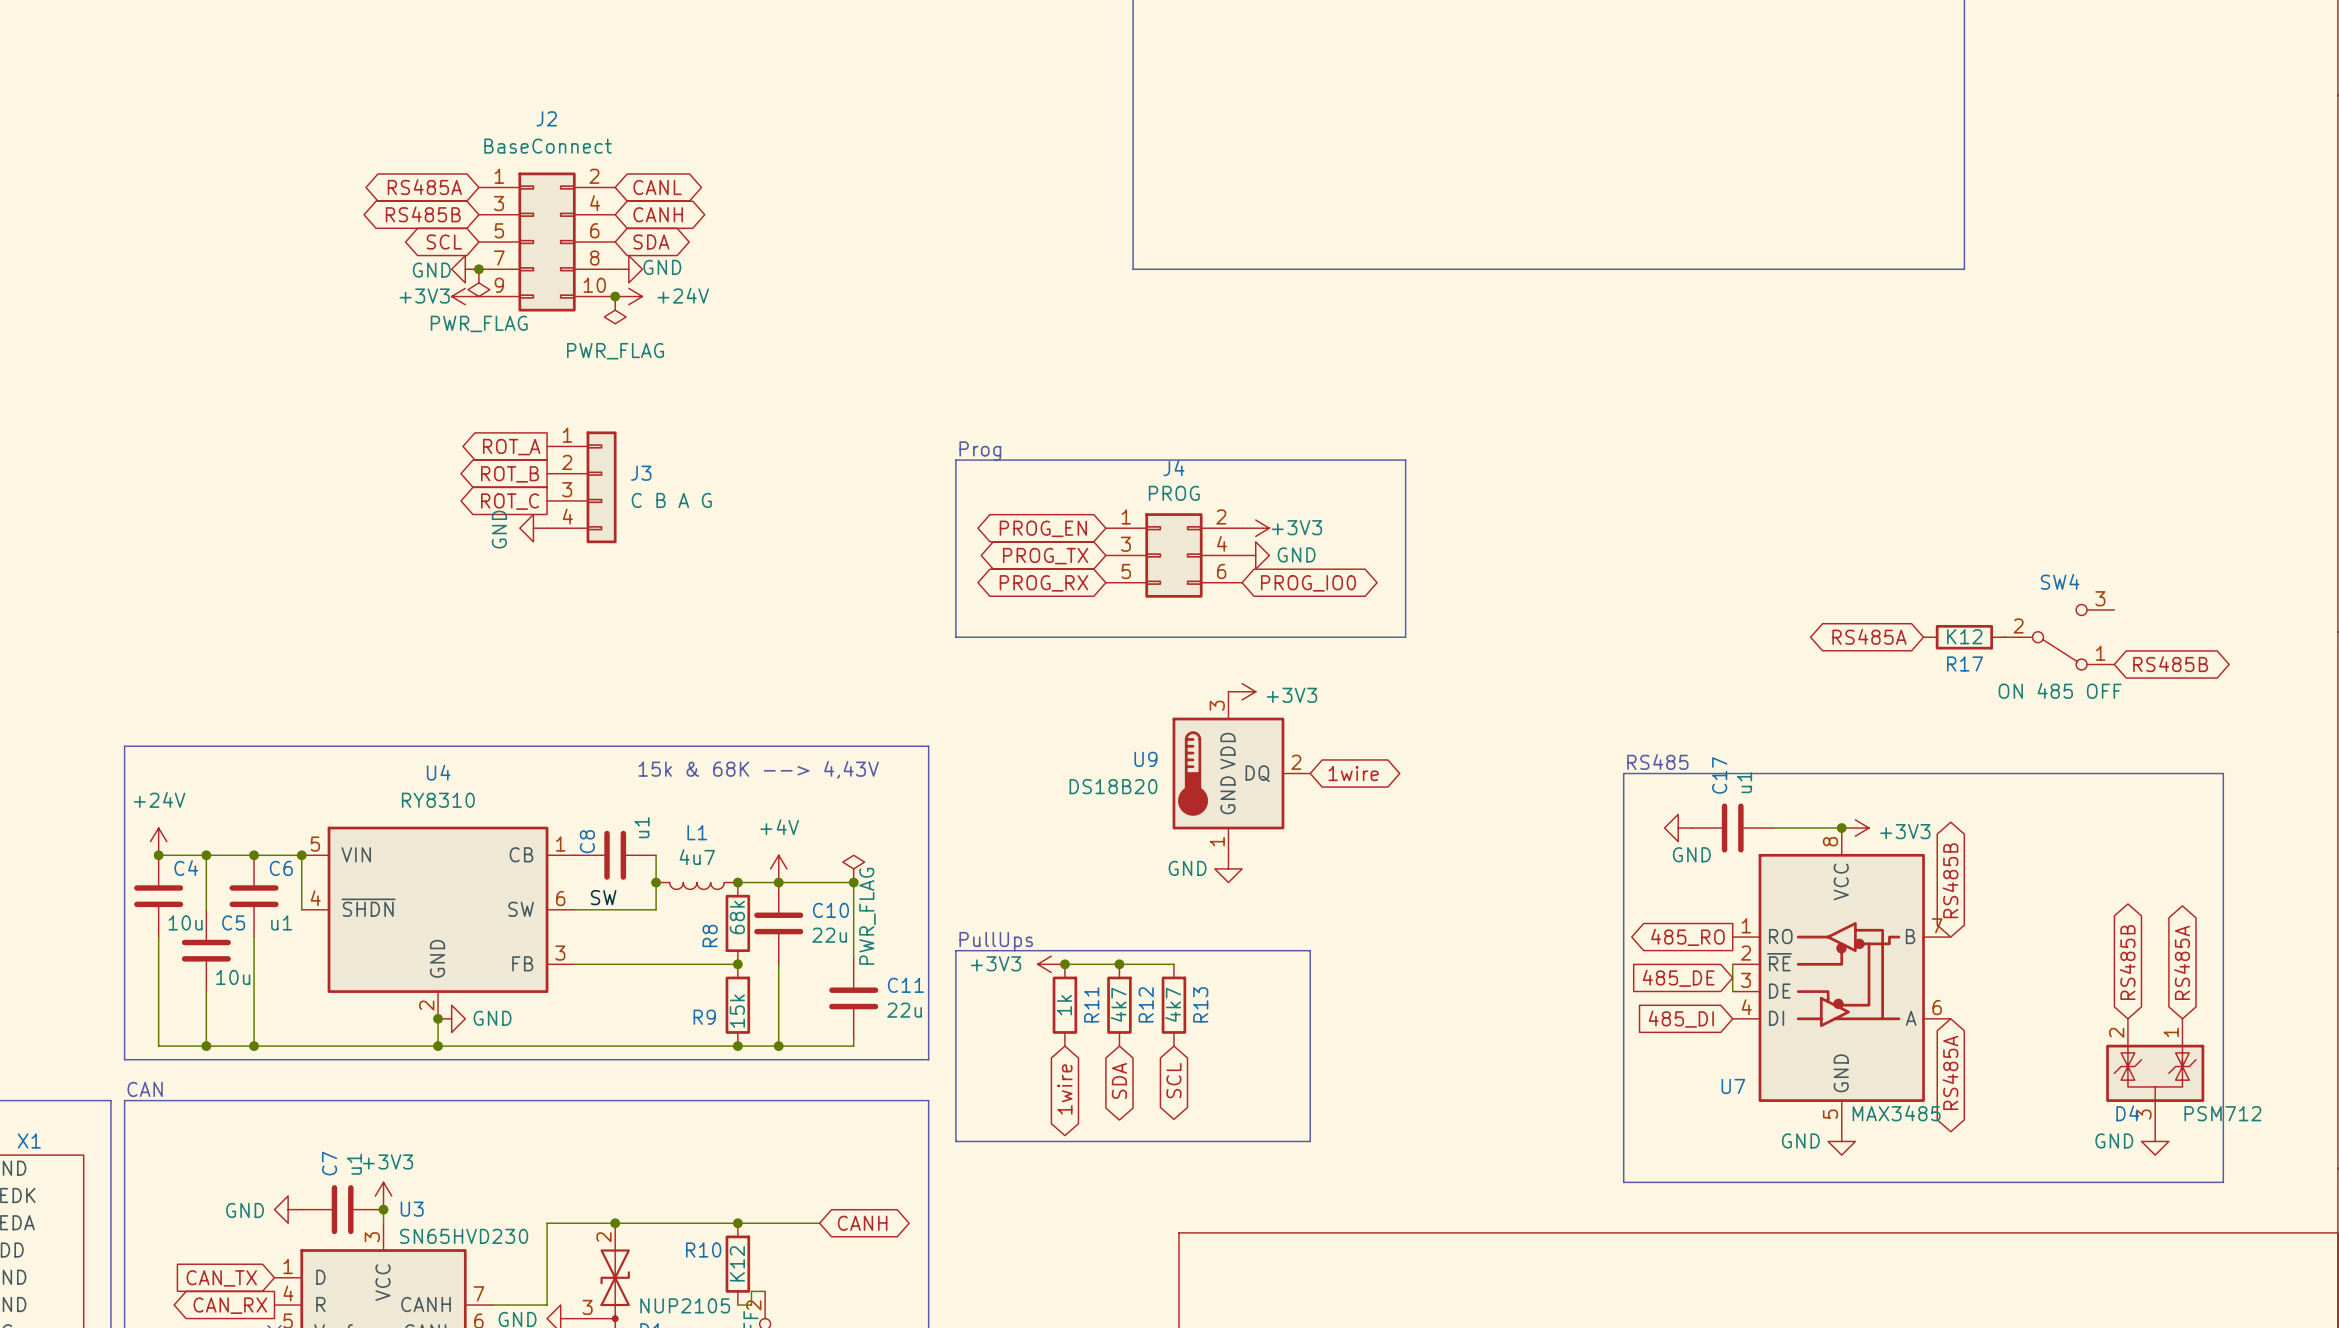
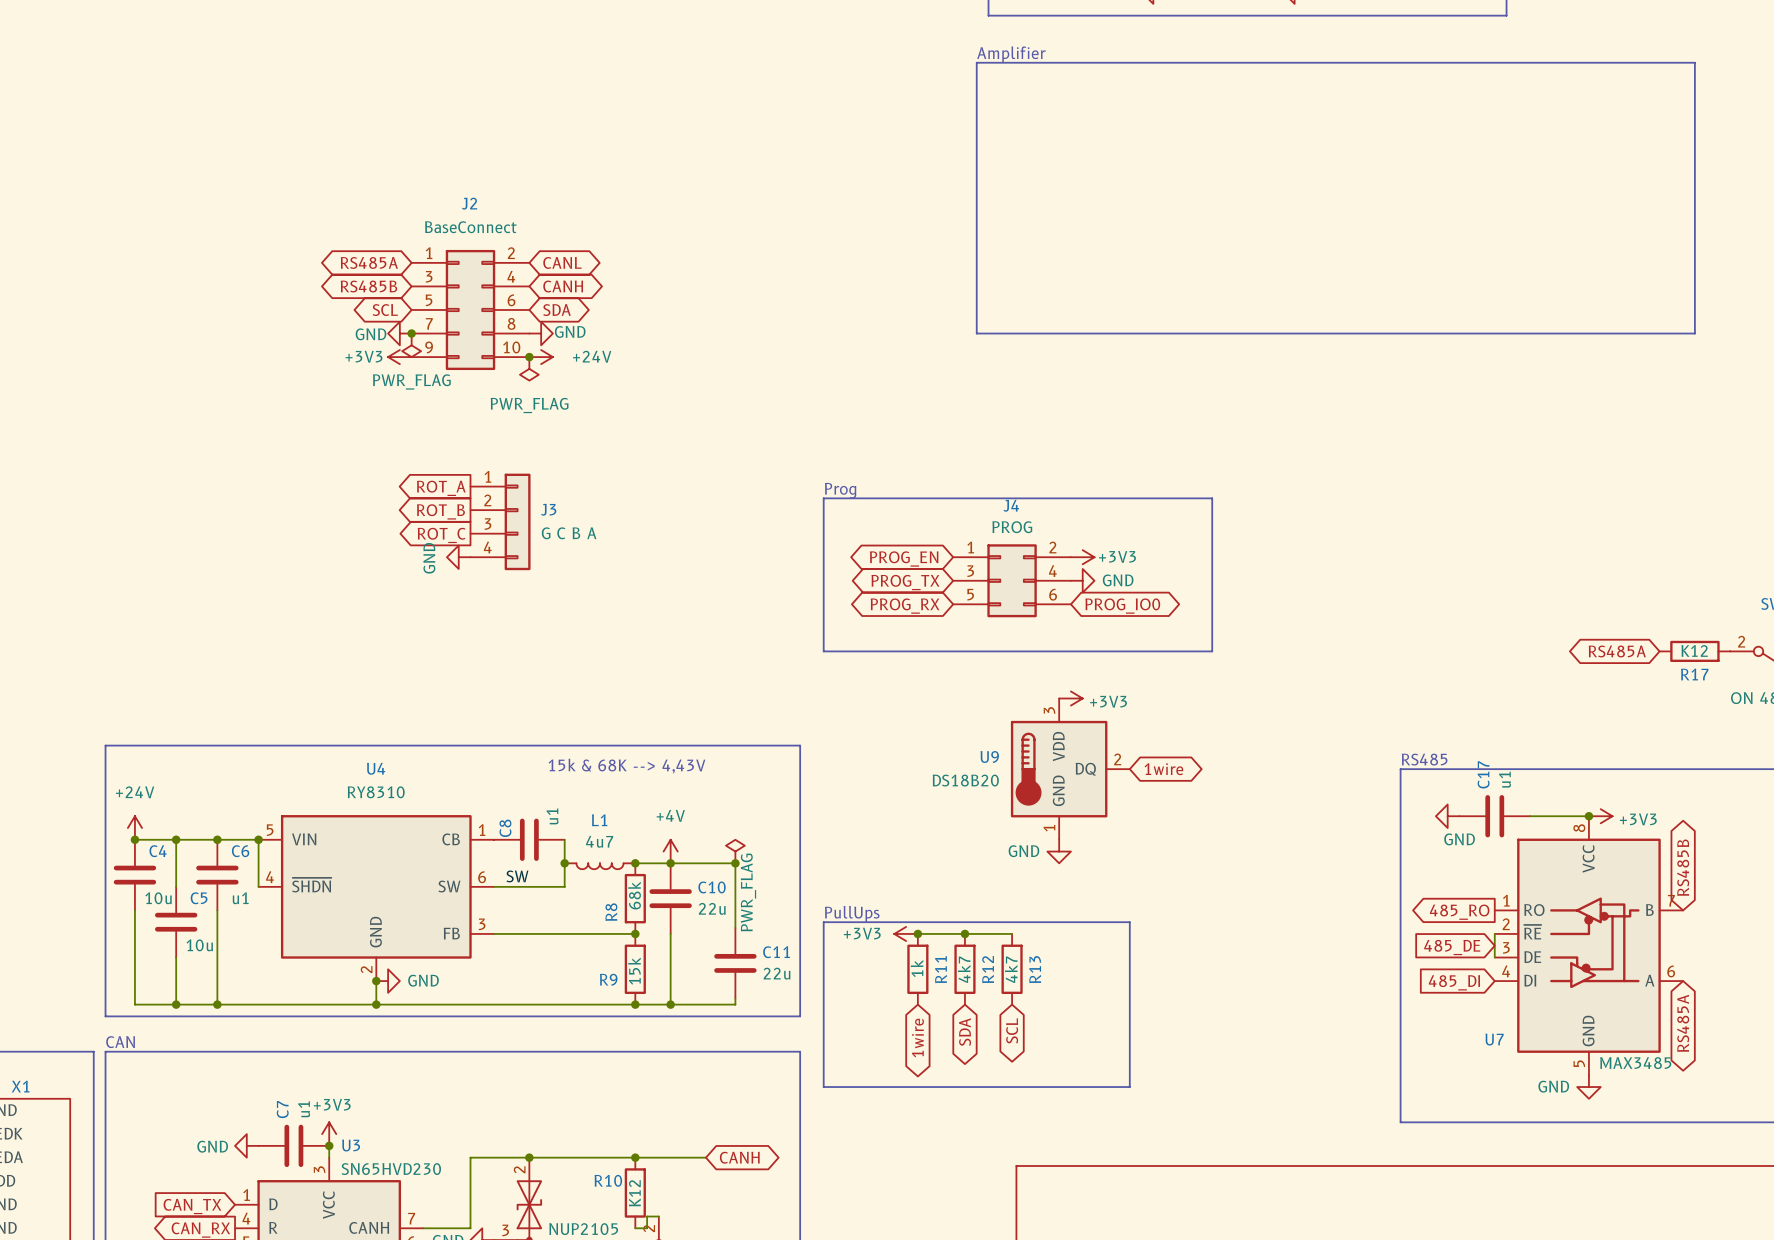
J3 value: C B A G (671, 500) -> G C B A (569, 533)

